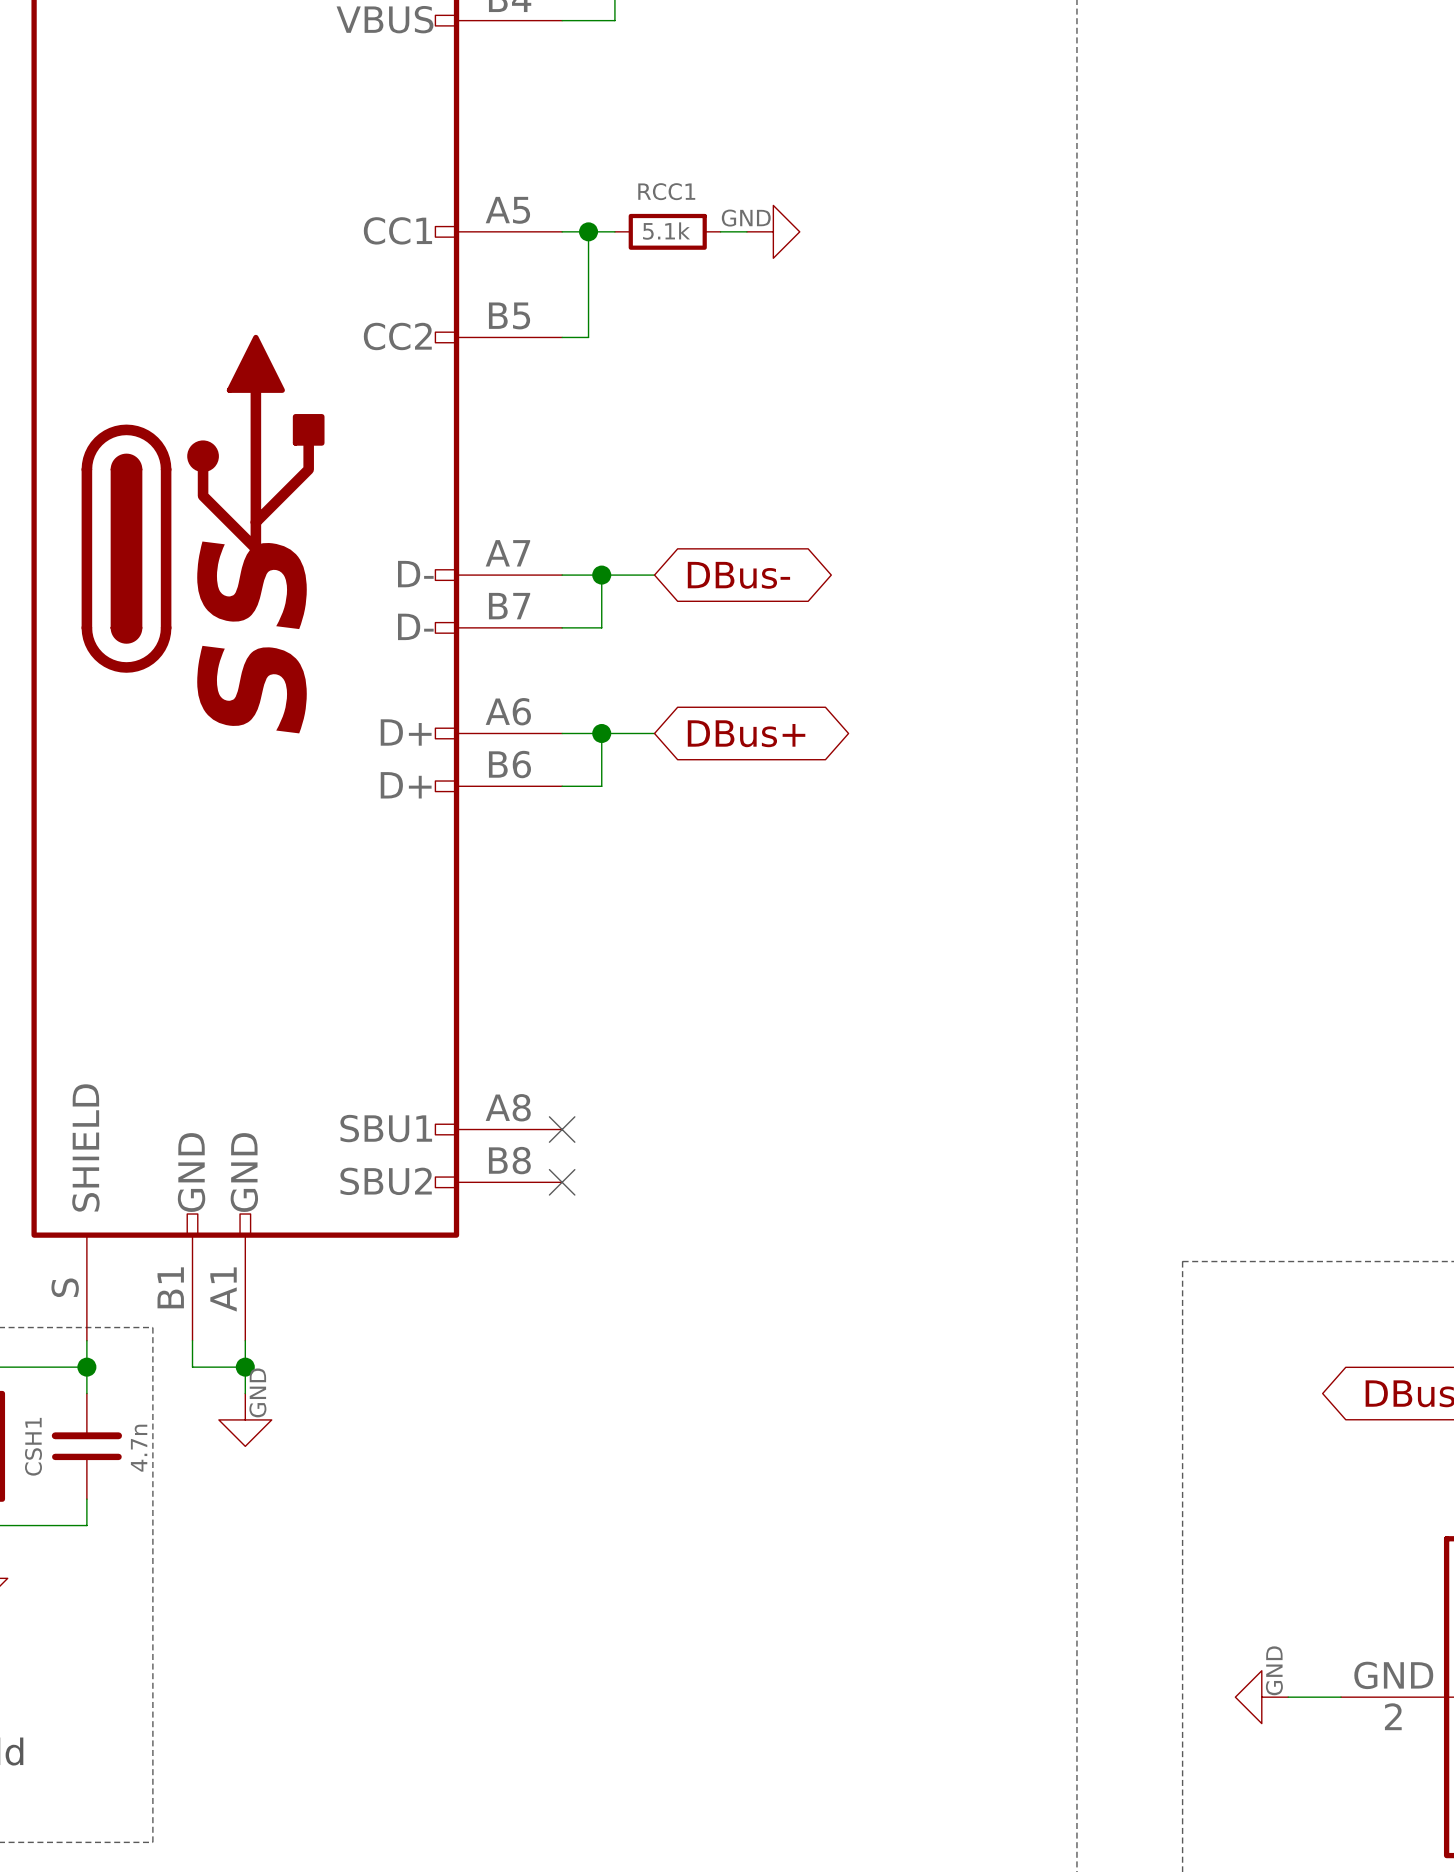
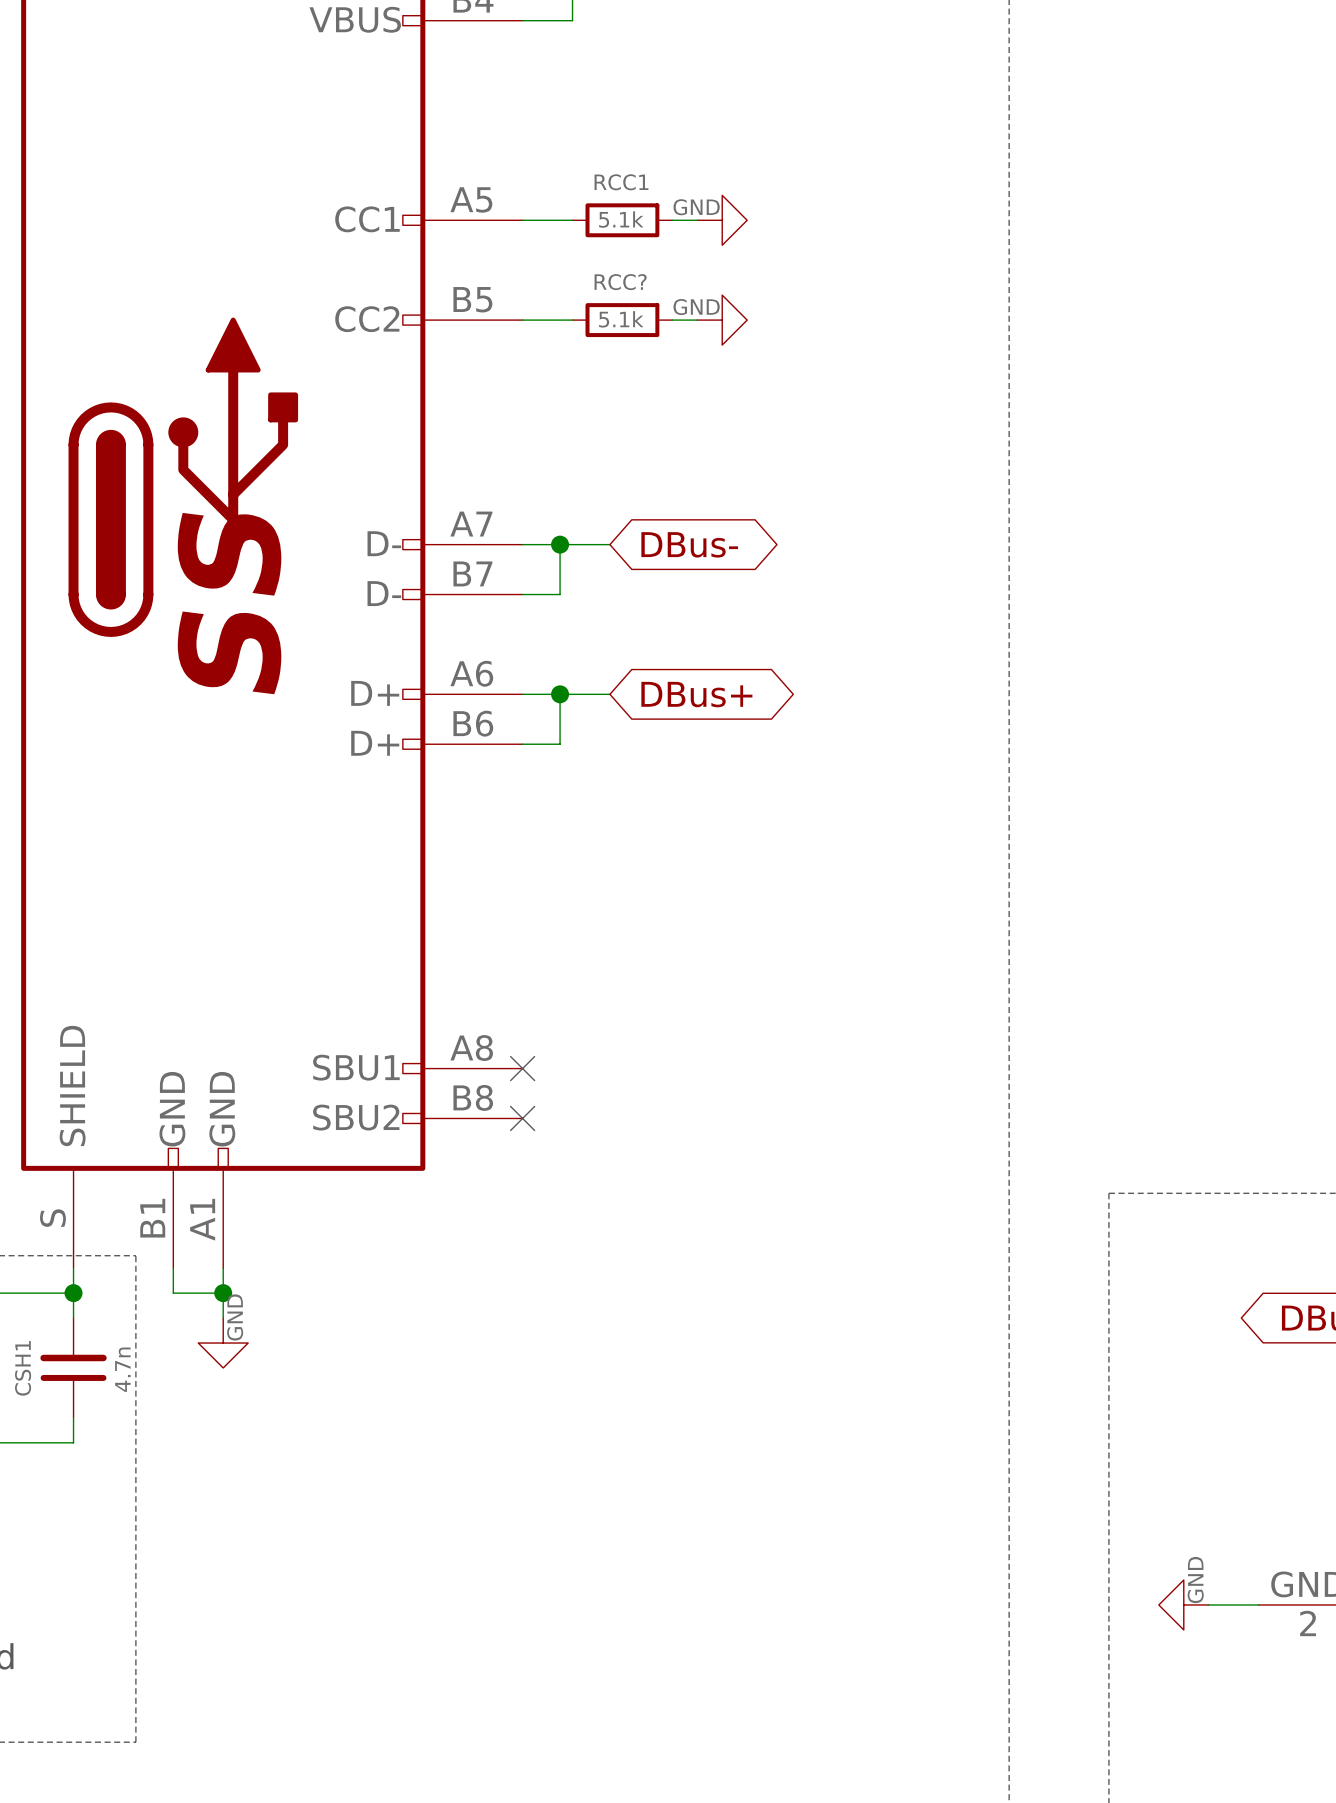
wire: (588, 231) (588, 337) -> (572, 320) (547, 320)
junction: (588, 231) -> none
RCC?: none -> 5.1k (622, 320)
wire: none -> (672, 320) (697, 320)
power symbol: none -> GND (722, 320)

